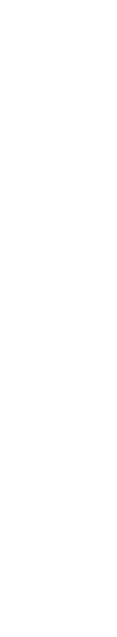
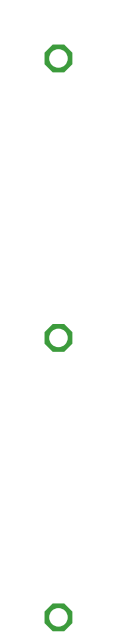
part: none -> (58, 58)
part: none -> (58, 337)
part: none -> (58, 617)

